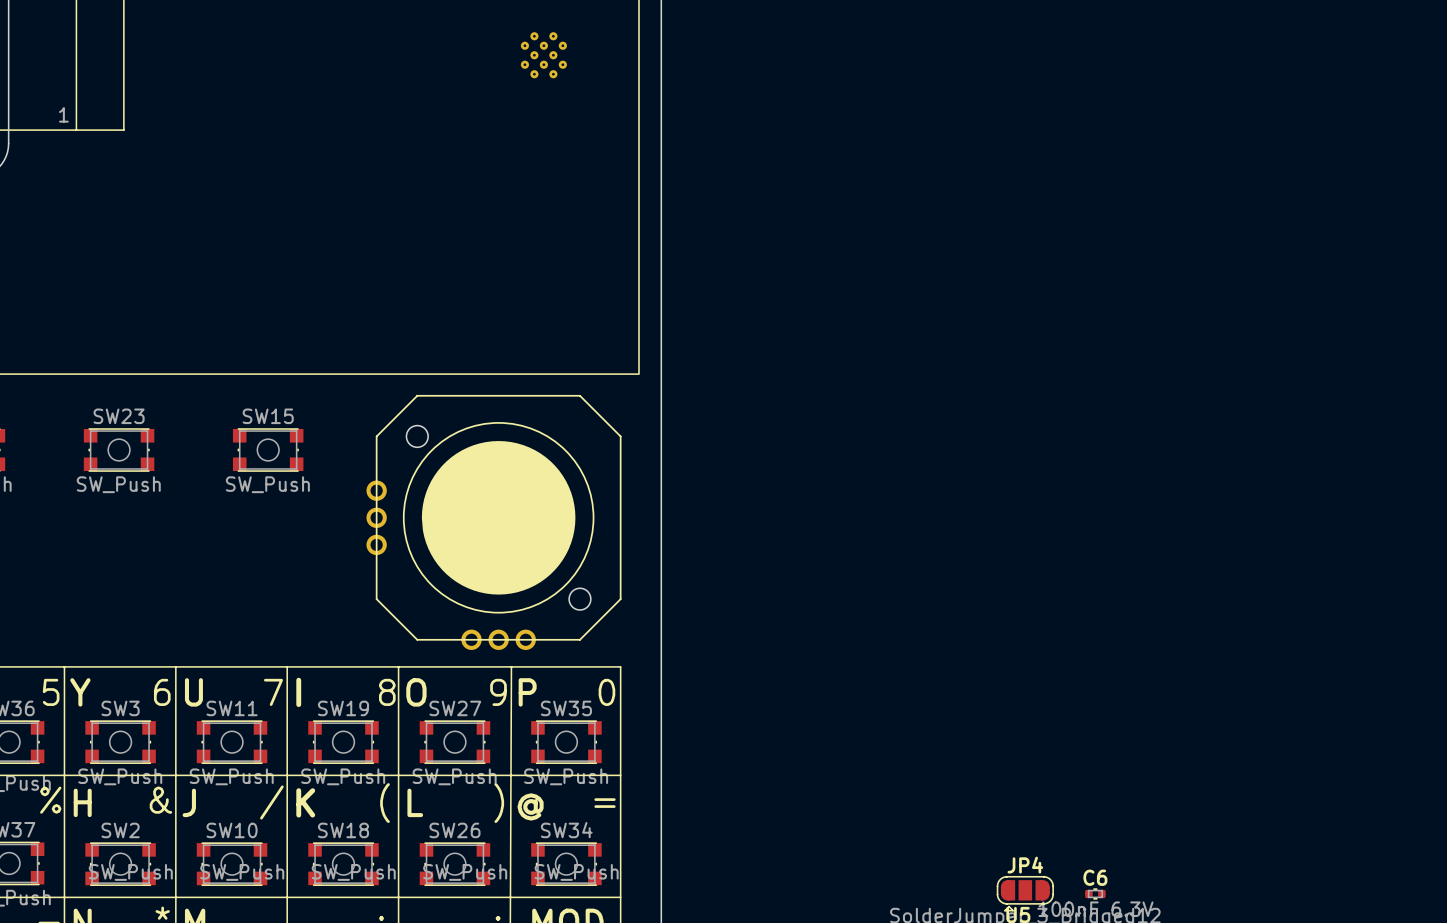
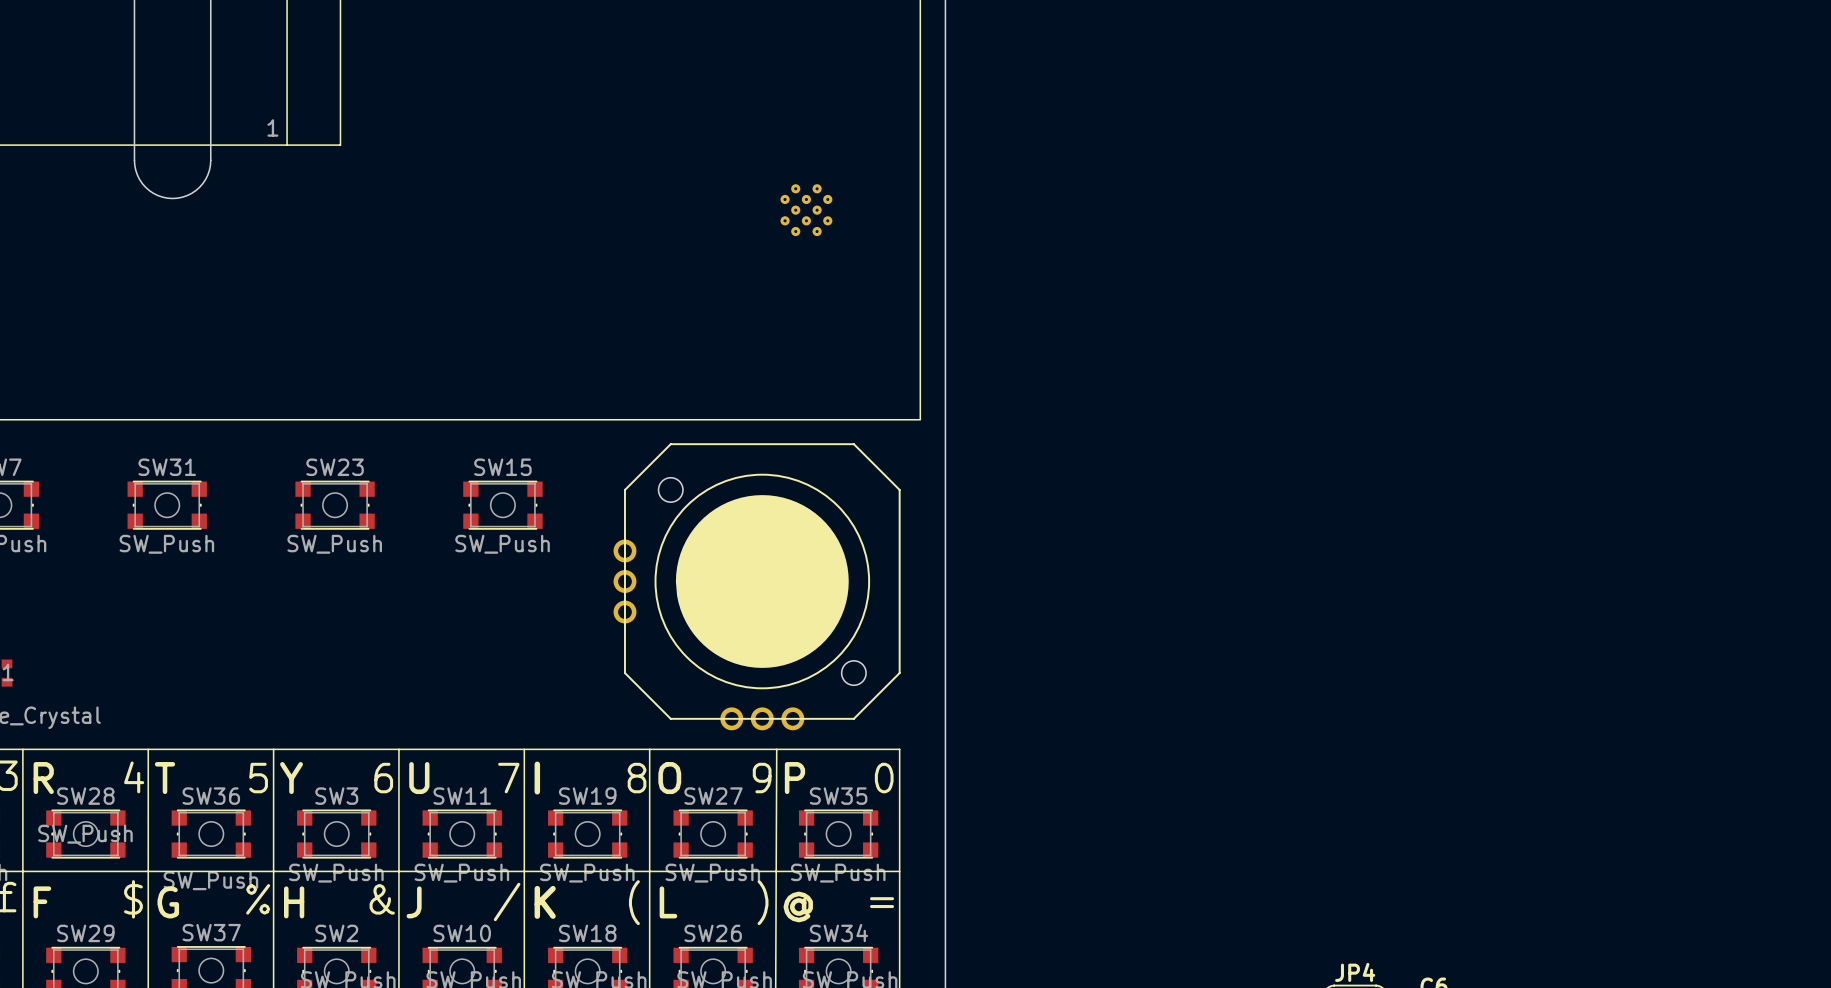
part position: (543, 55) -> (806, 210)

